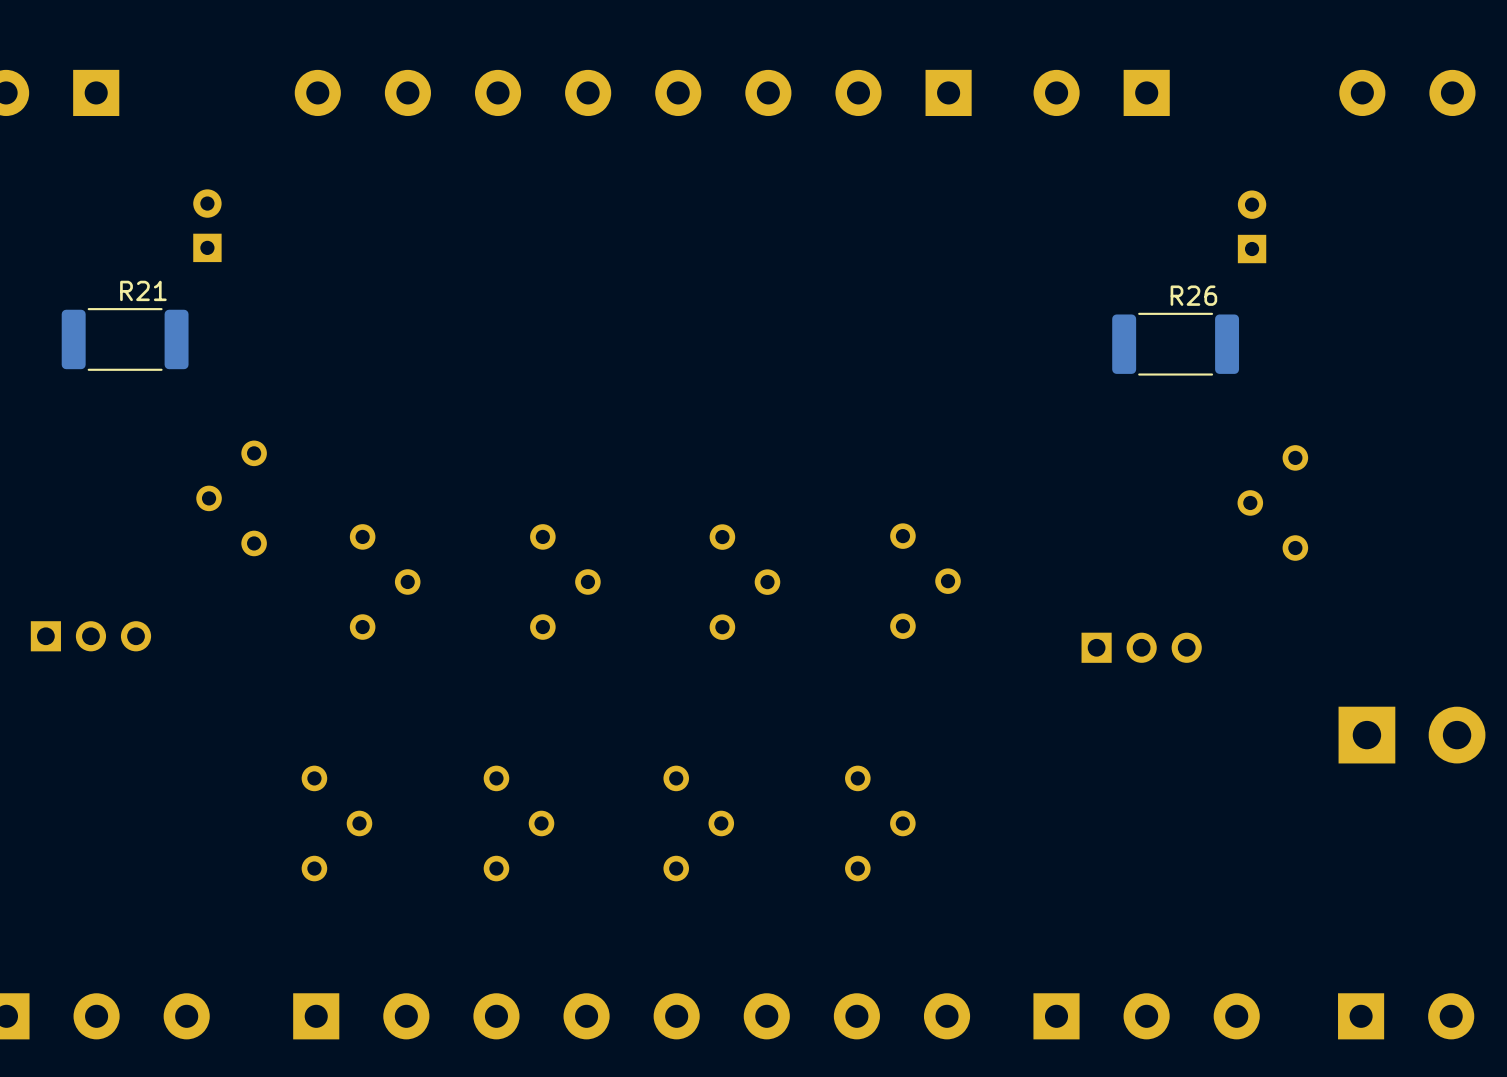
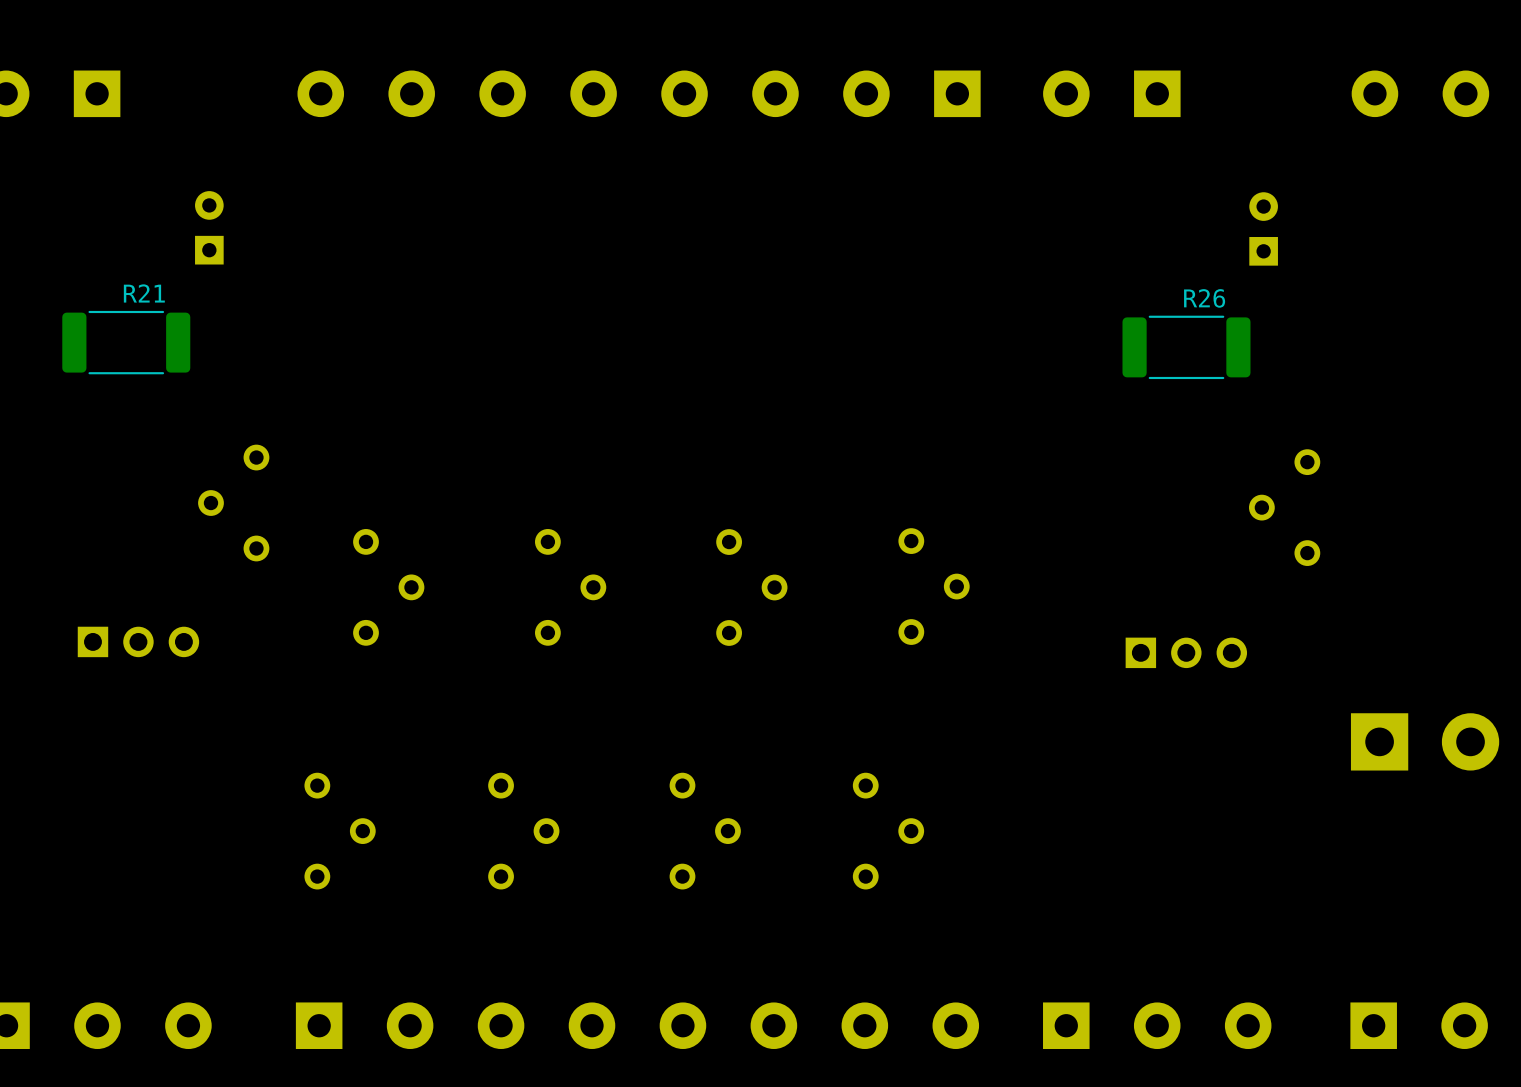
part position: (90, 636) -> (138, 641)
part position: (1141, 647) -> (1186, 652)

